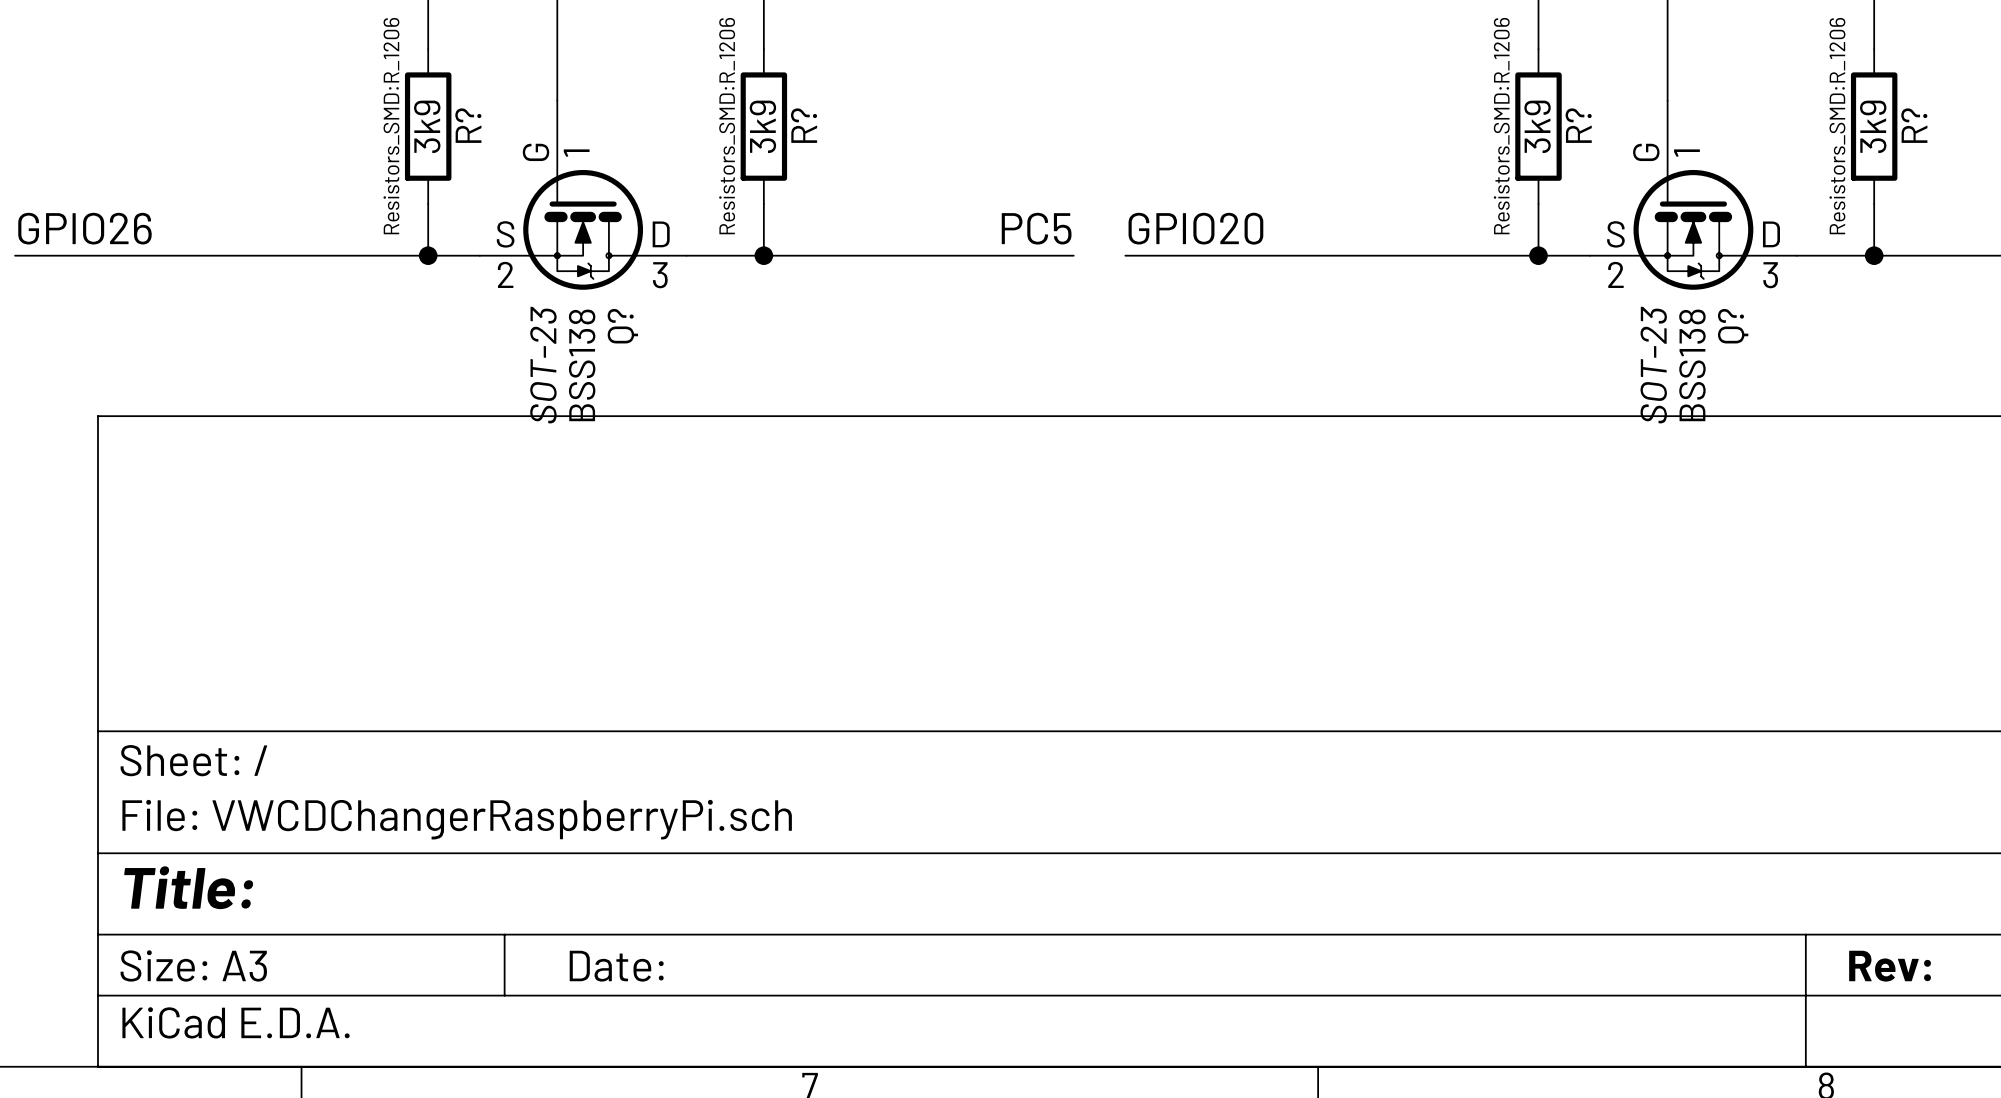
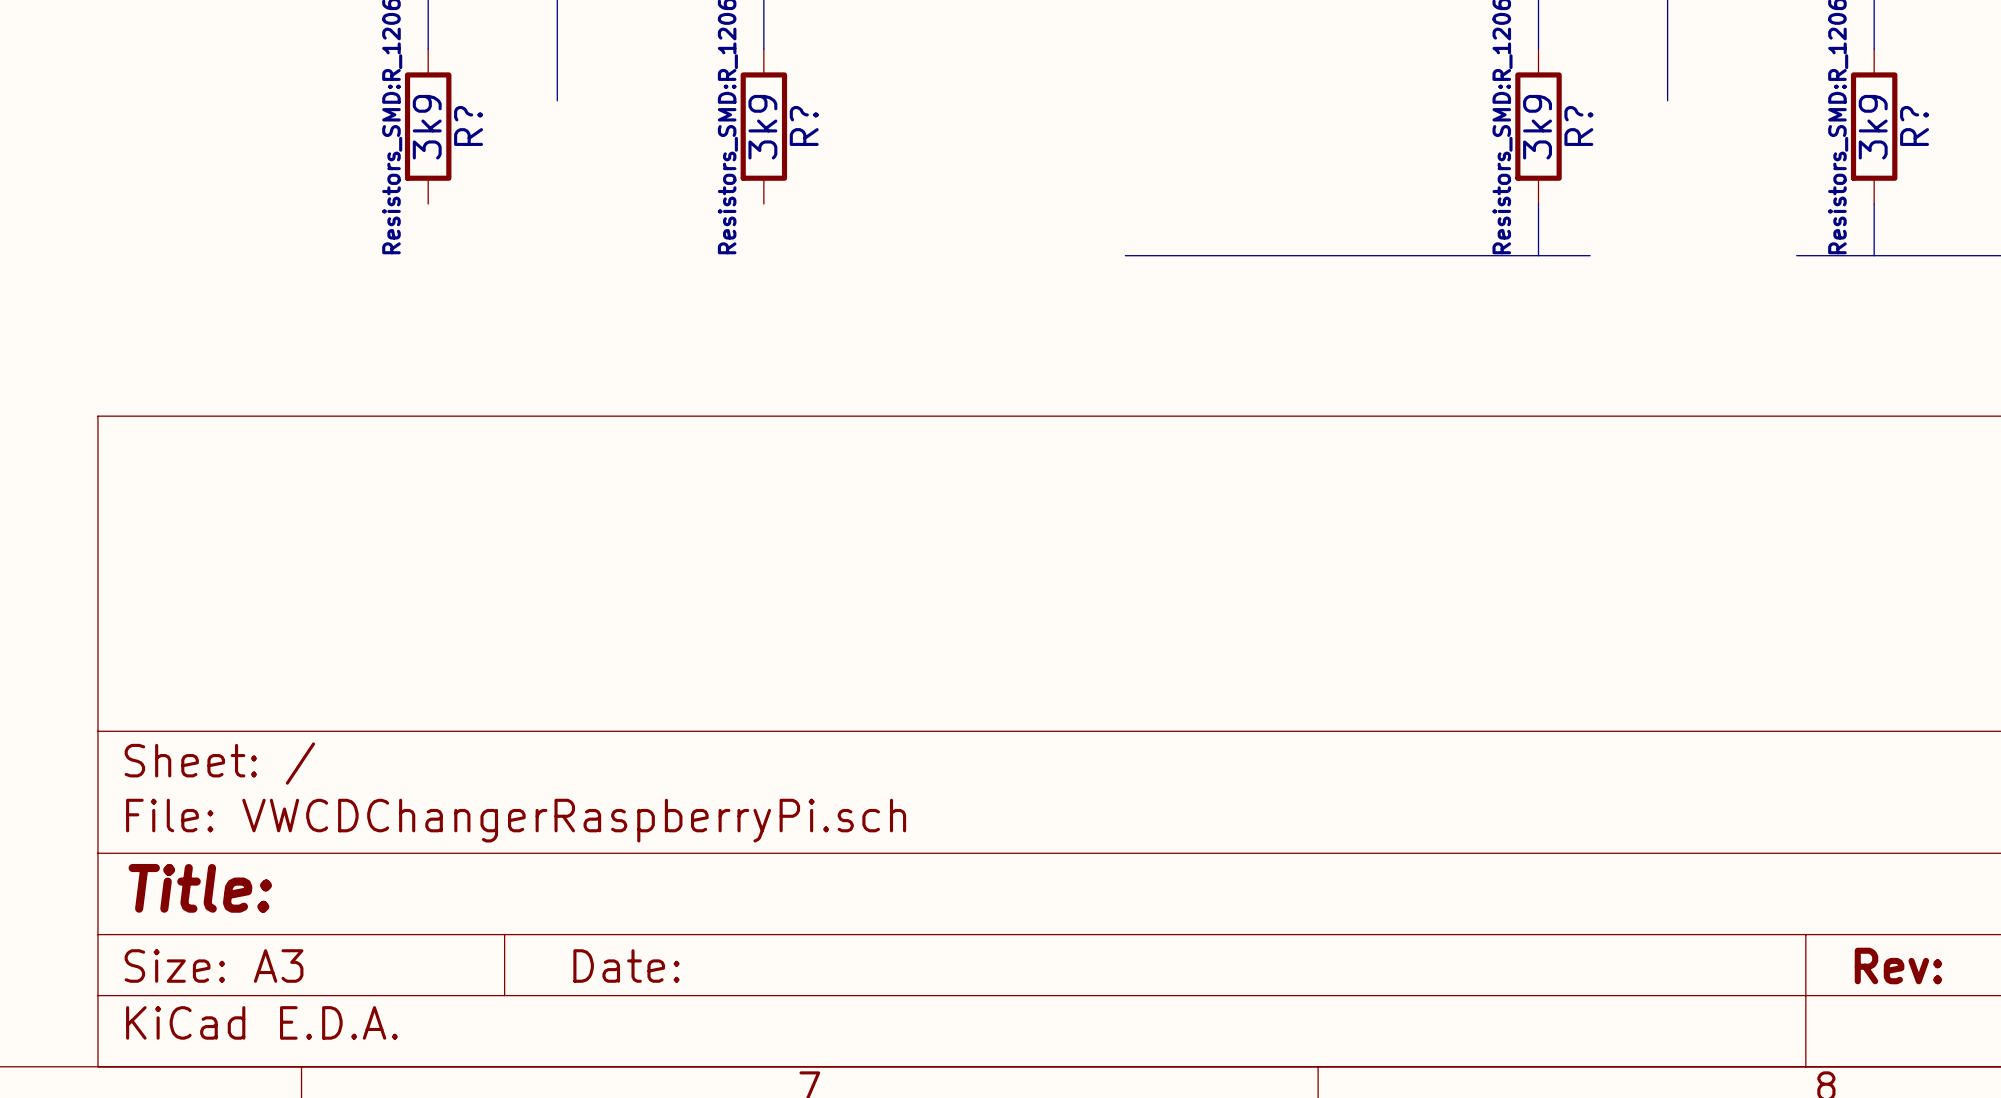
Q?: BSS138 (583, 195) -> none
Q?: BSS138 (1693, 195) -> none
wire: (428, 204) (428, 255) -> none
wire: (763, 204) (763, 255) -> none
label: GPIO26 (84, 228) -> none
label: PC5 (1036, 228) -> none
label: GPIO20 (1195, 228) -> none
wire: (15, 255) (479, 255) -> none
junction: (428, 255) -> none
wire: (686, 255) (1073, 255) -> none
junction: (763, 255) -> none
junction: (1538, 255) -> none
junction: (1874, 255) -> none

